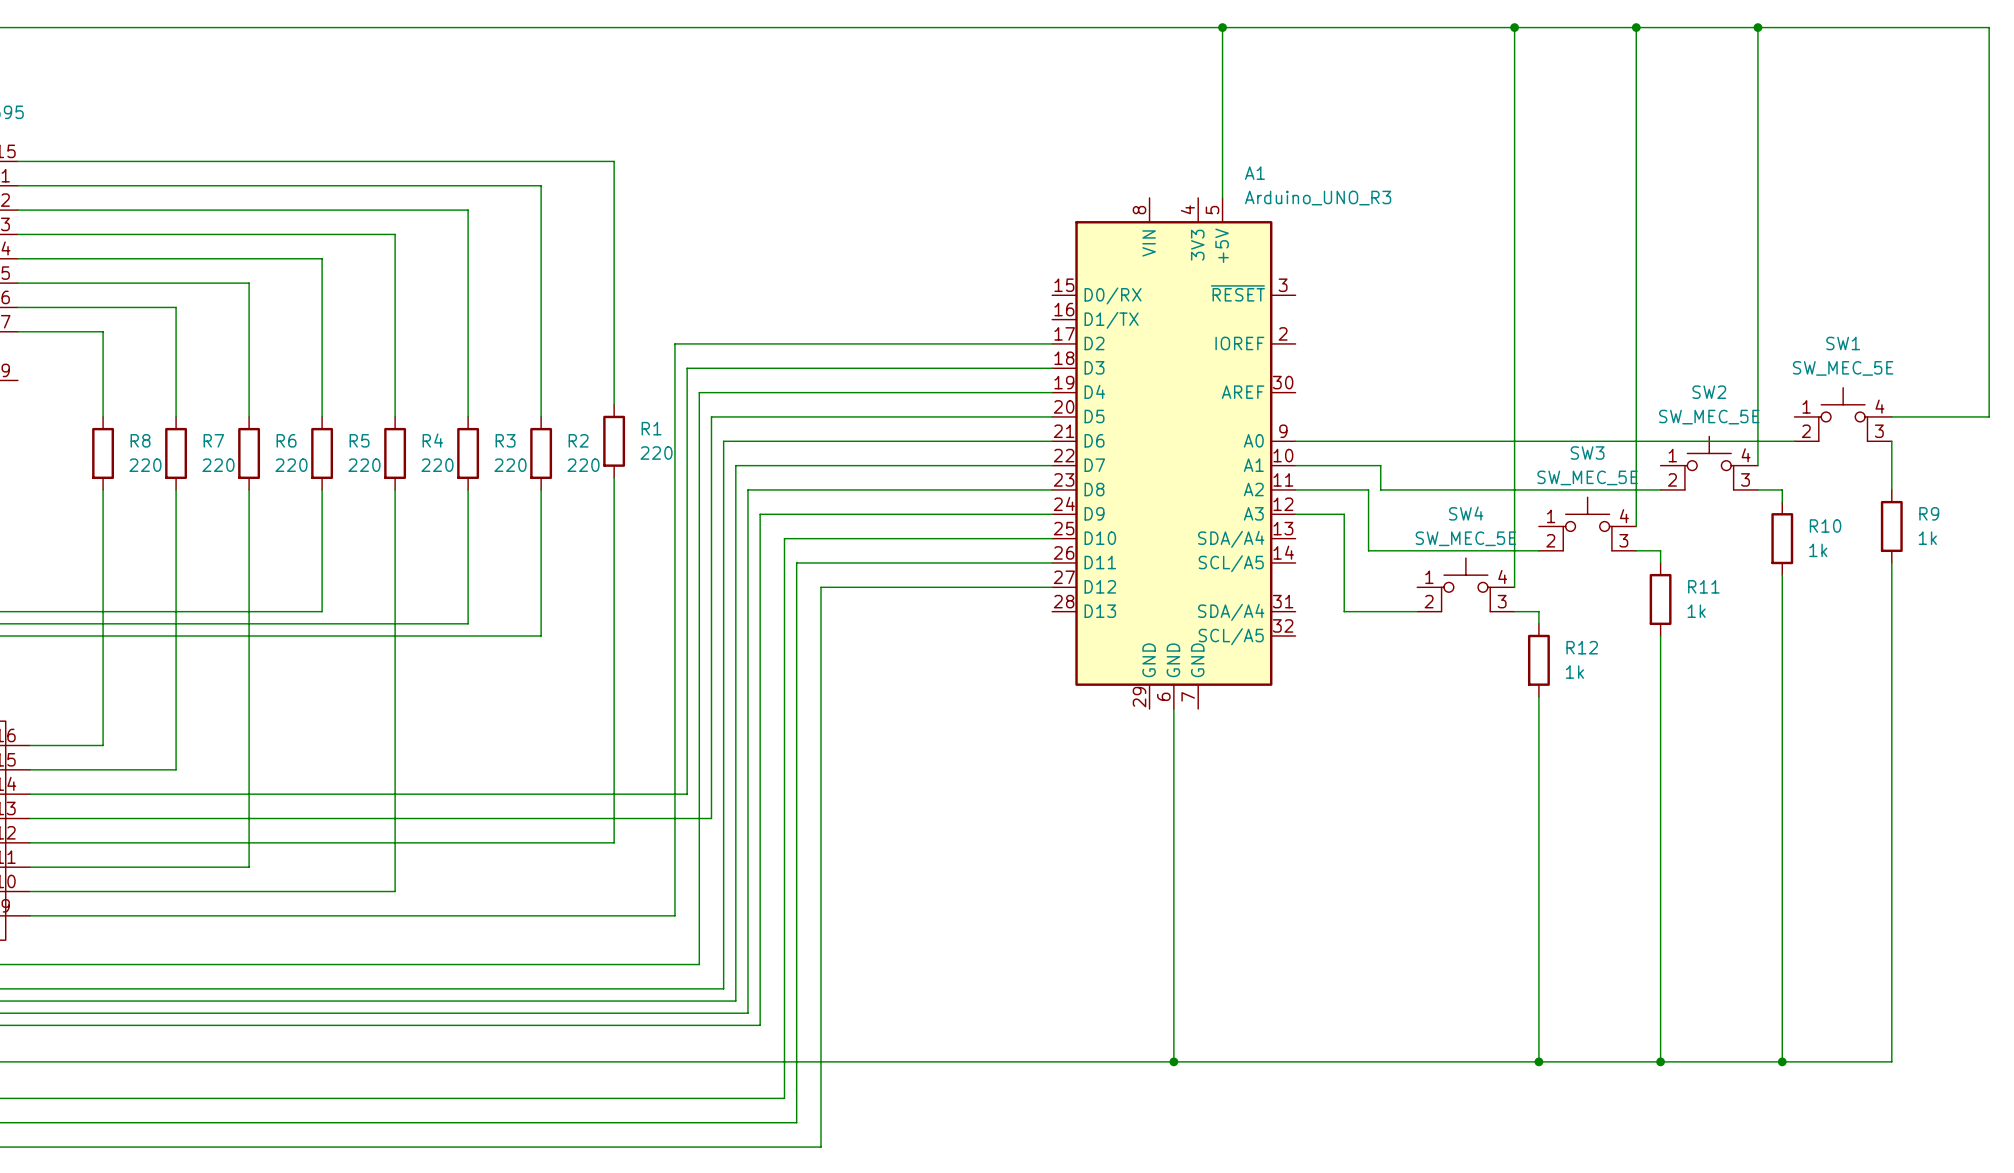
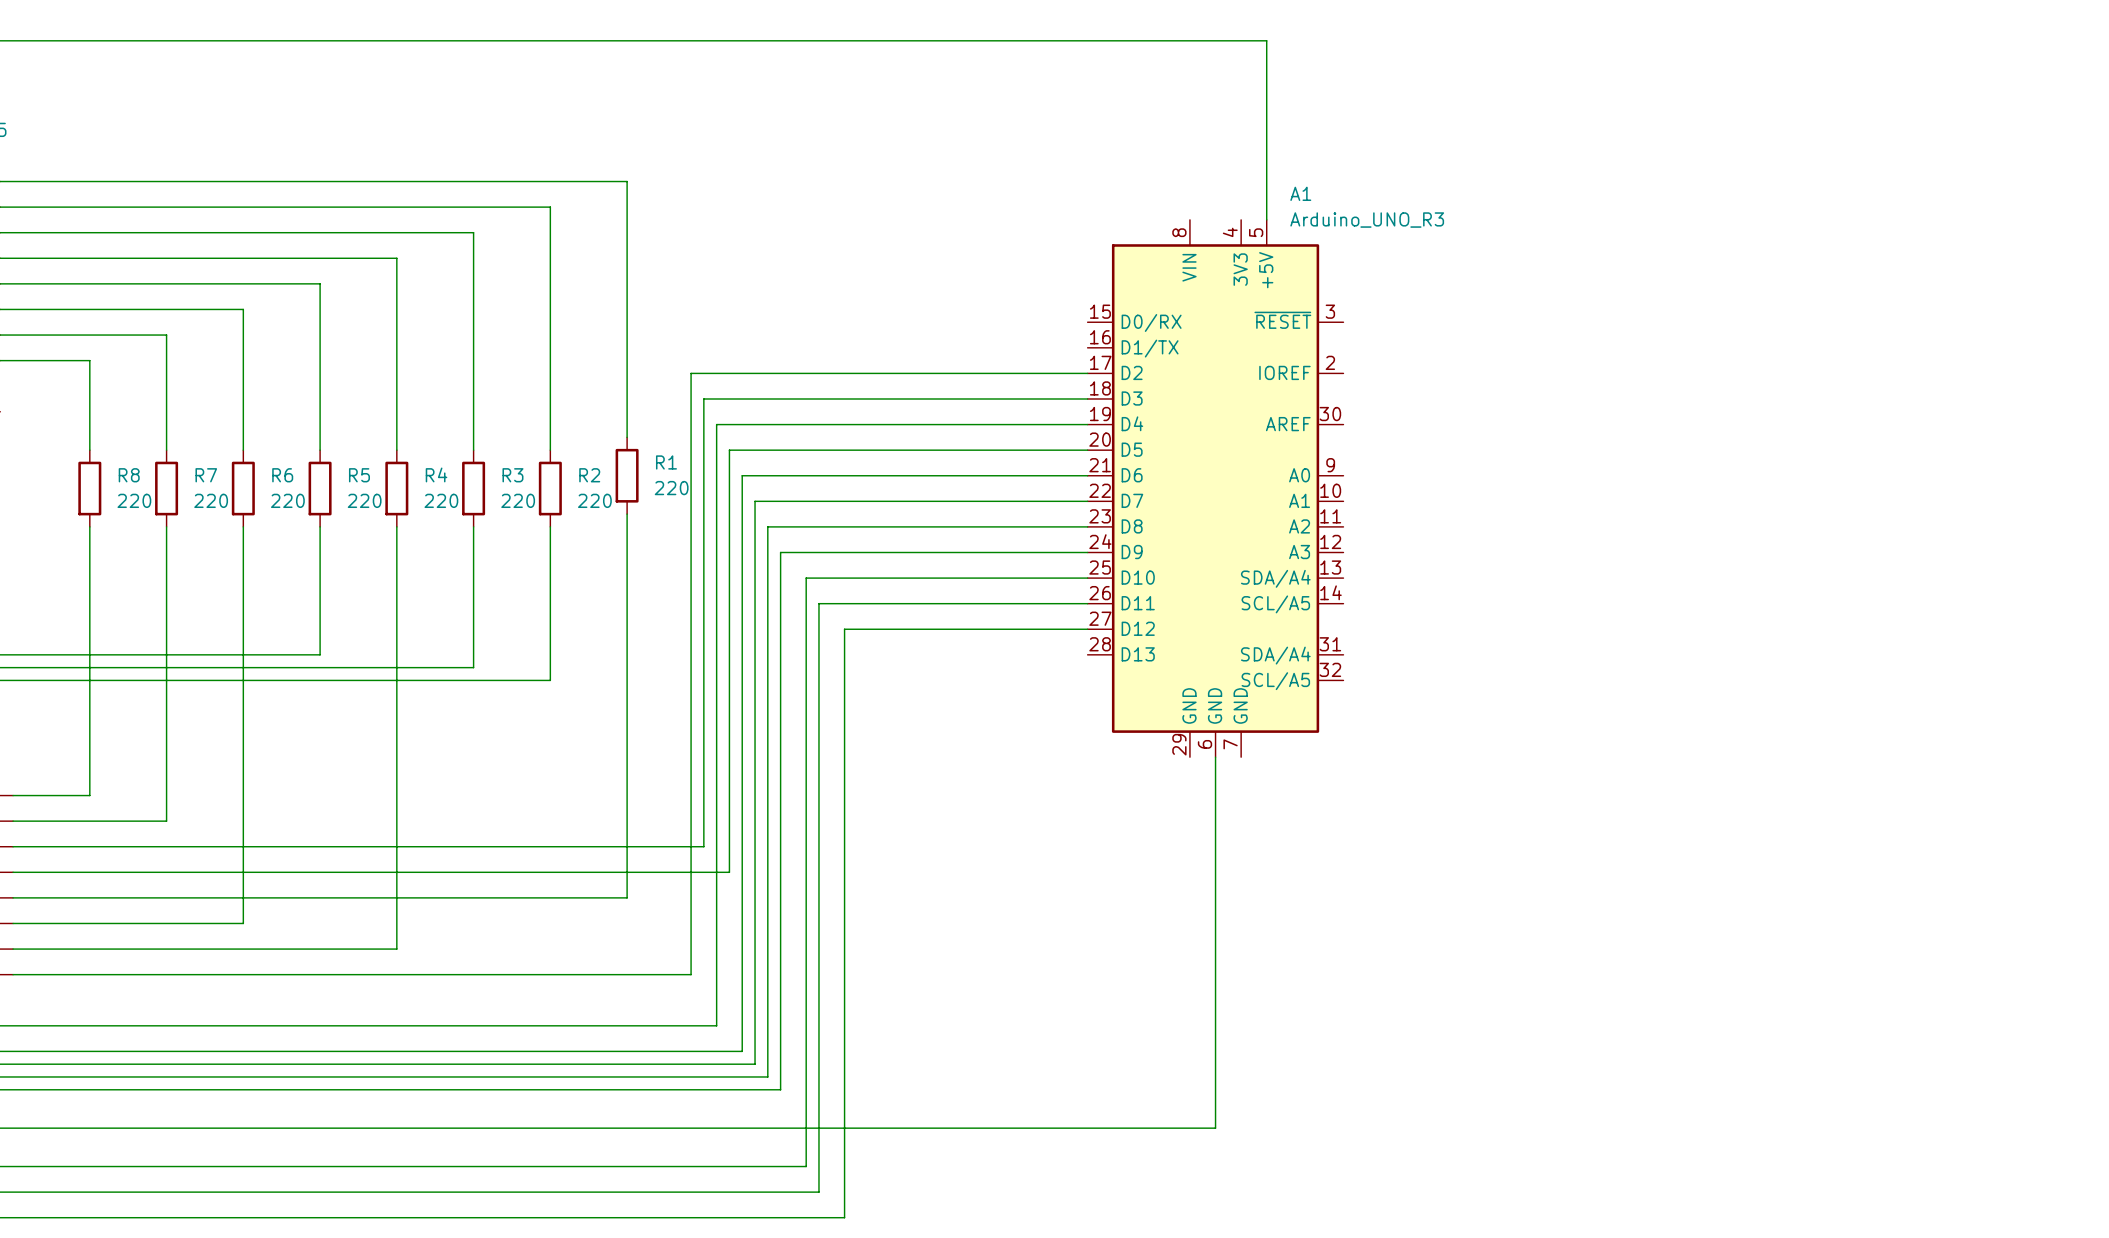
wire: (1222, 27) (1989, 27) (1989, 416) (1891, 416) -> none
junction: (1222, 27) -> none
wire: (1514, 27) (1514, 587) -> none
junction: (1514, 27) -> none
wire: (1636, 27) (1636, 526) -> none
junction: (1636, 27) -> none
wire: (1757, 27) (1757, 465) -> none
junction: (1757, 27) -> none
SW1: SW_MEC_5E (1843, 414) -> none
wire: (1295, 441) (1794, 441) -> none
wire: (1891, 441) (1891, 489) -> none
SW2: SW_MEC_5E (1709, 463) -> none
wire: (1295, 465) (1380, 465) (1380, 489) (1660, 489) -> none
wire: (1295, 489) (1368, 489) (1368, 550) (1538, 550) -> none
wire: (1757, 489) (1782, 489) (1782, 502) -> none
wire: (1295, 514) (1344, 514) (1344, 611) (1417, 611) -> none
SW3: SW_MEC_5E (1587, 524) -> none
R9: 1k (1891, 526) -> none
R10: 1k (1782, 538) -> none
wire: (1636, 550) (1660, 550) (1660, 562) -> none
wire: (1891, 562) (1891, 1061) (1173, 1061) -> none
wire: (1782, 575) (1782, 1061) -> none
SW4: SW_MEC_5E (1465, 584) -> none
R11: 1k (1660, 599) -> none
wire: (1514, 611) (1538, 611) (1538, 623) -> none
wire: (1660, 635) (1660, 1061) -> none
R12: 1k (1538, 660) -> none
wire: (1538, 696) (1538, 1061) -> none
junction: (1173, 1061) -> none
junction: (1538, 1061) -> none
junction: (1660, 1061) -> none
junction: (1782, 1061) -> none

